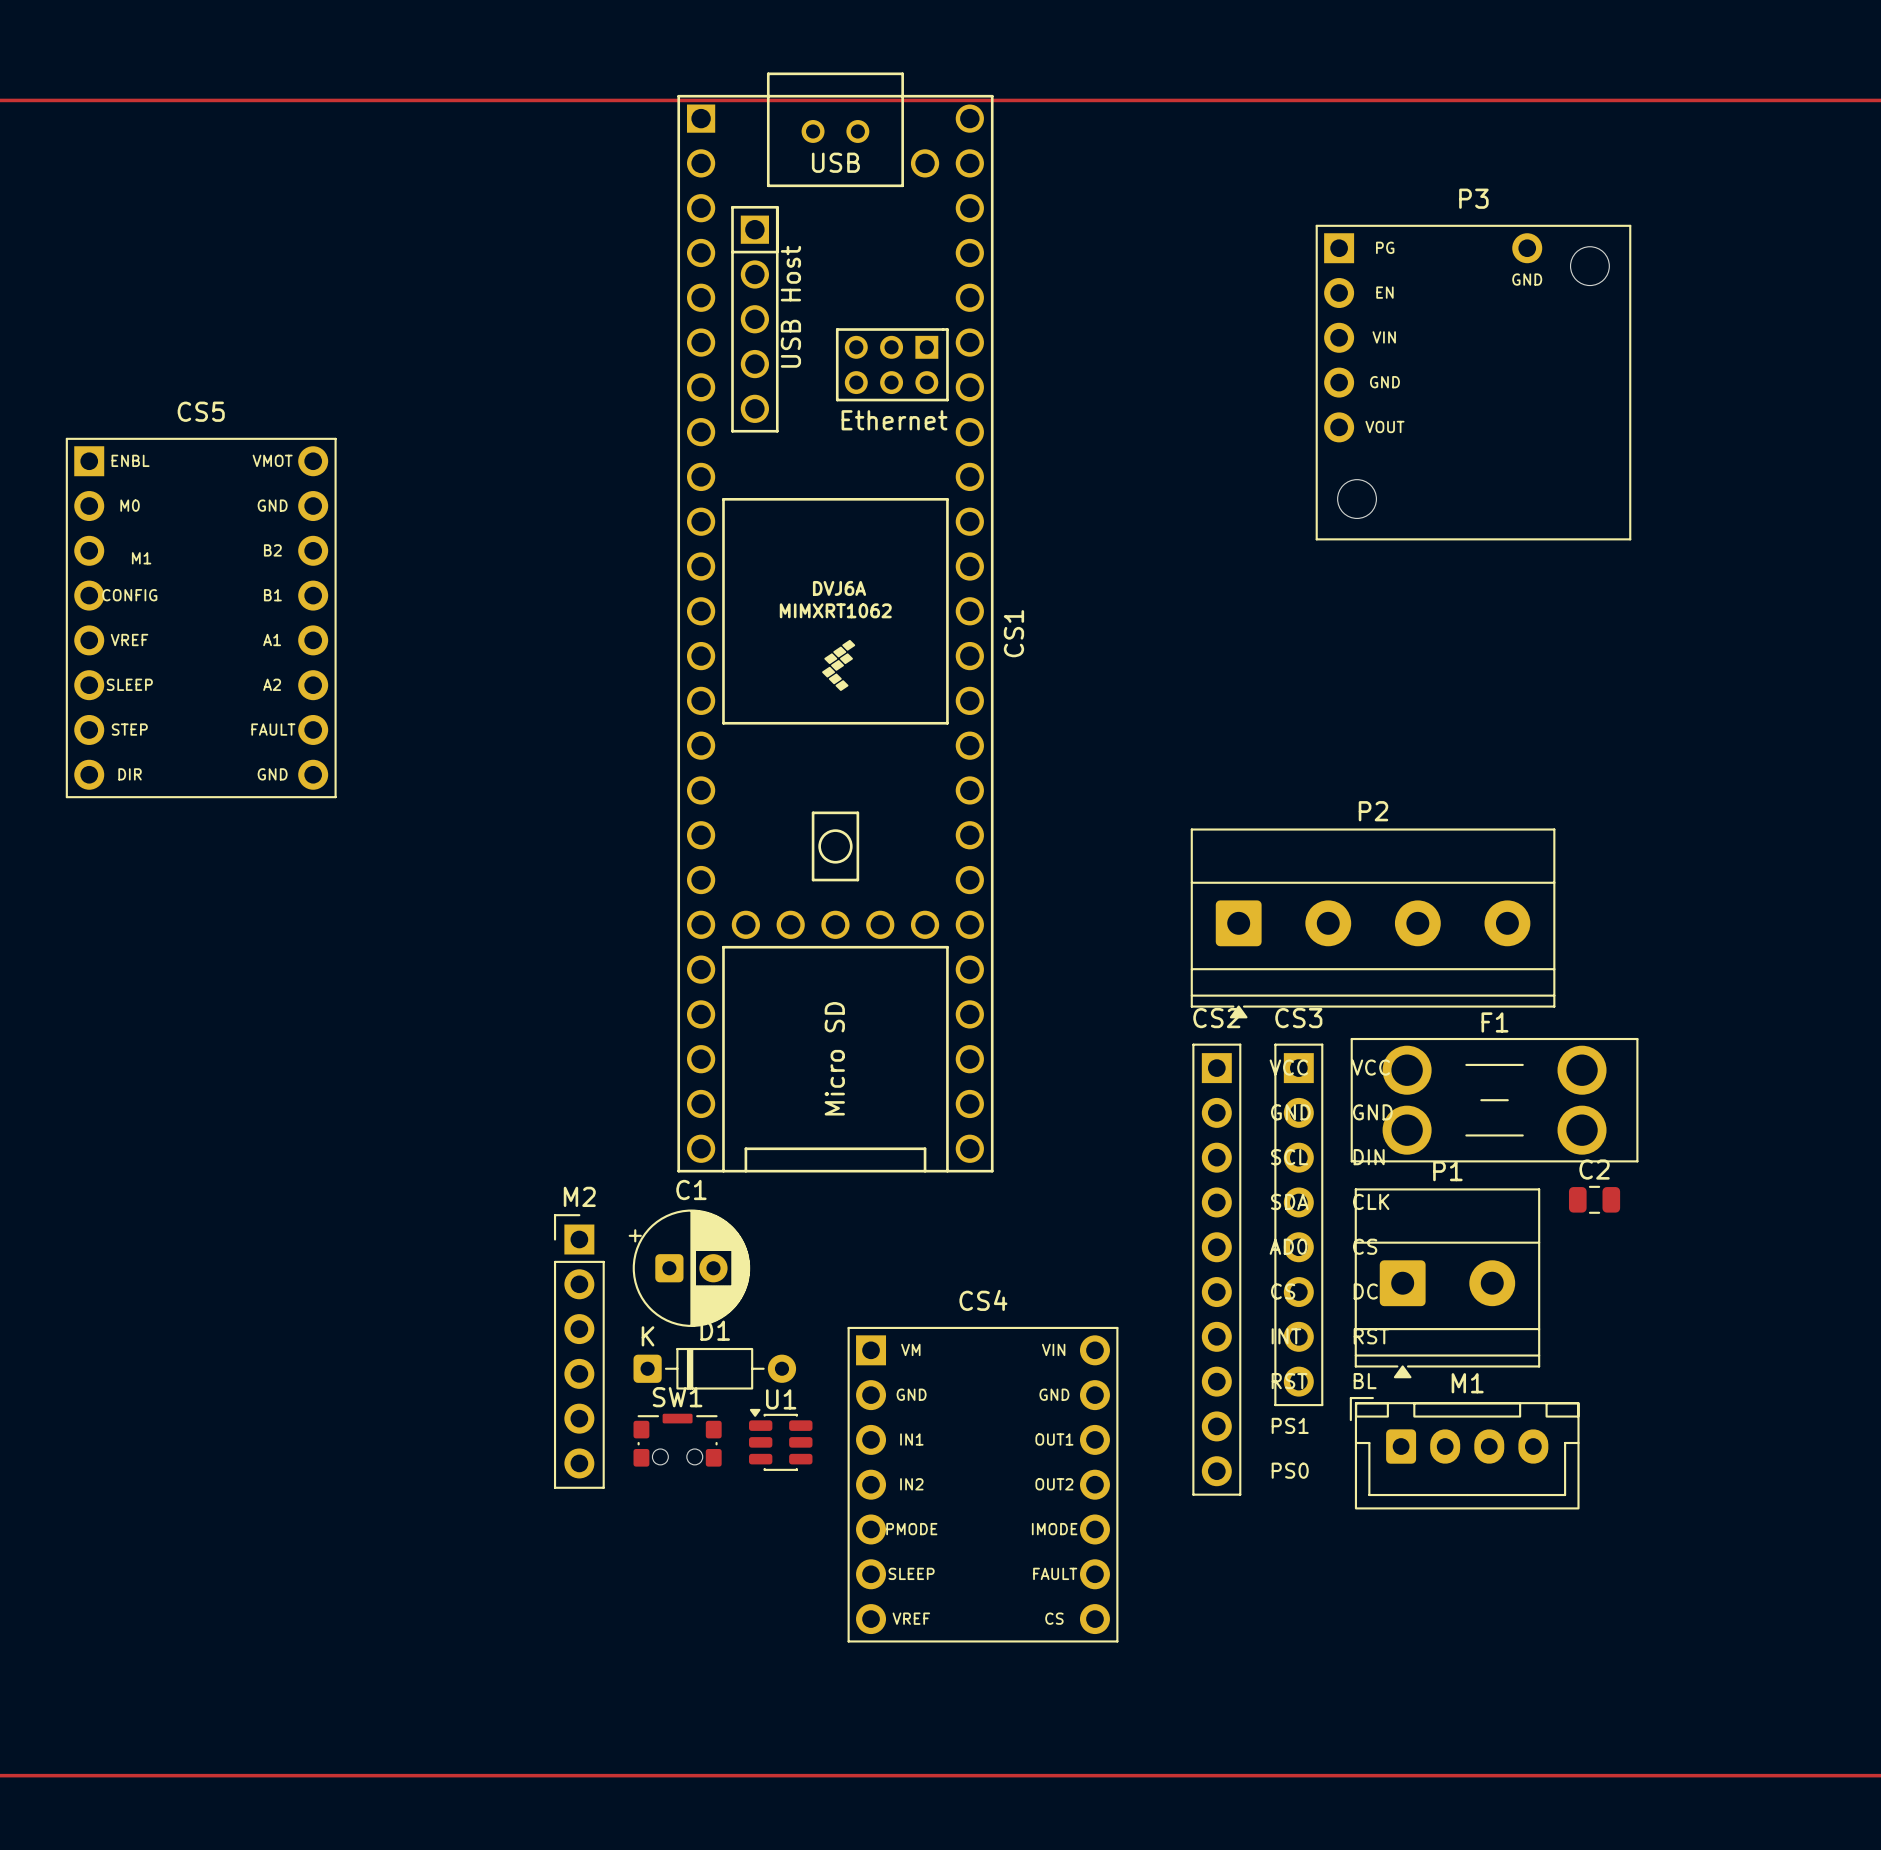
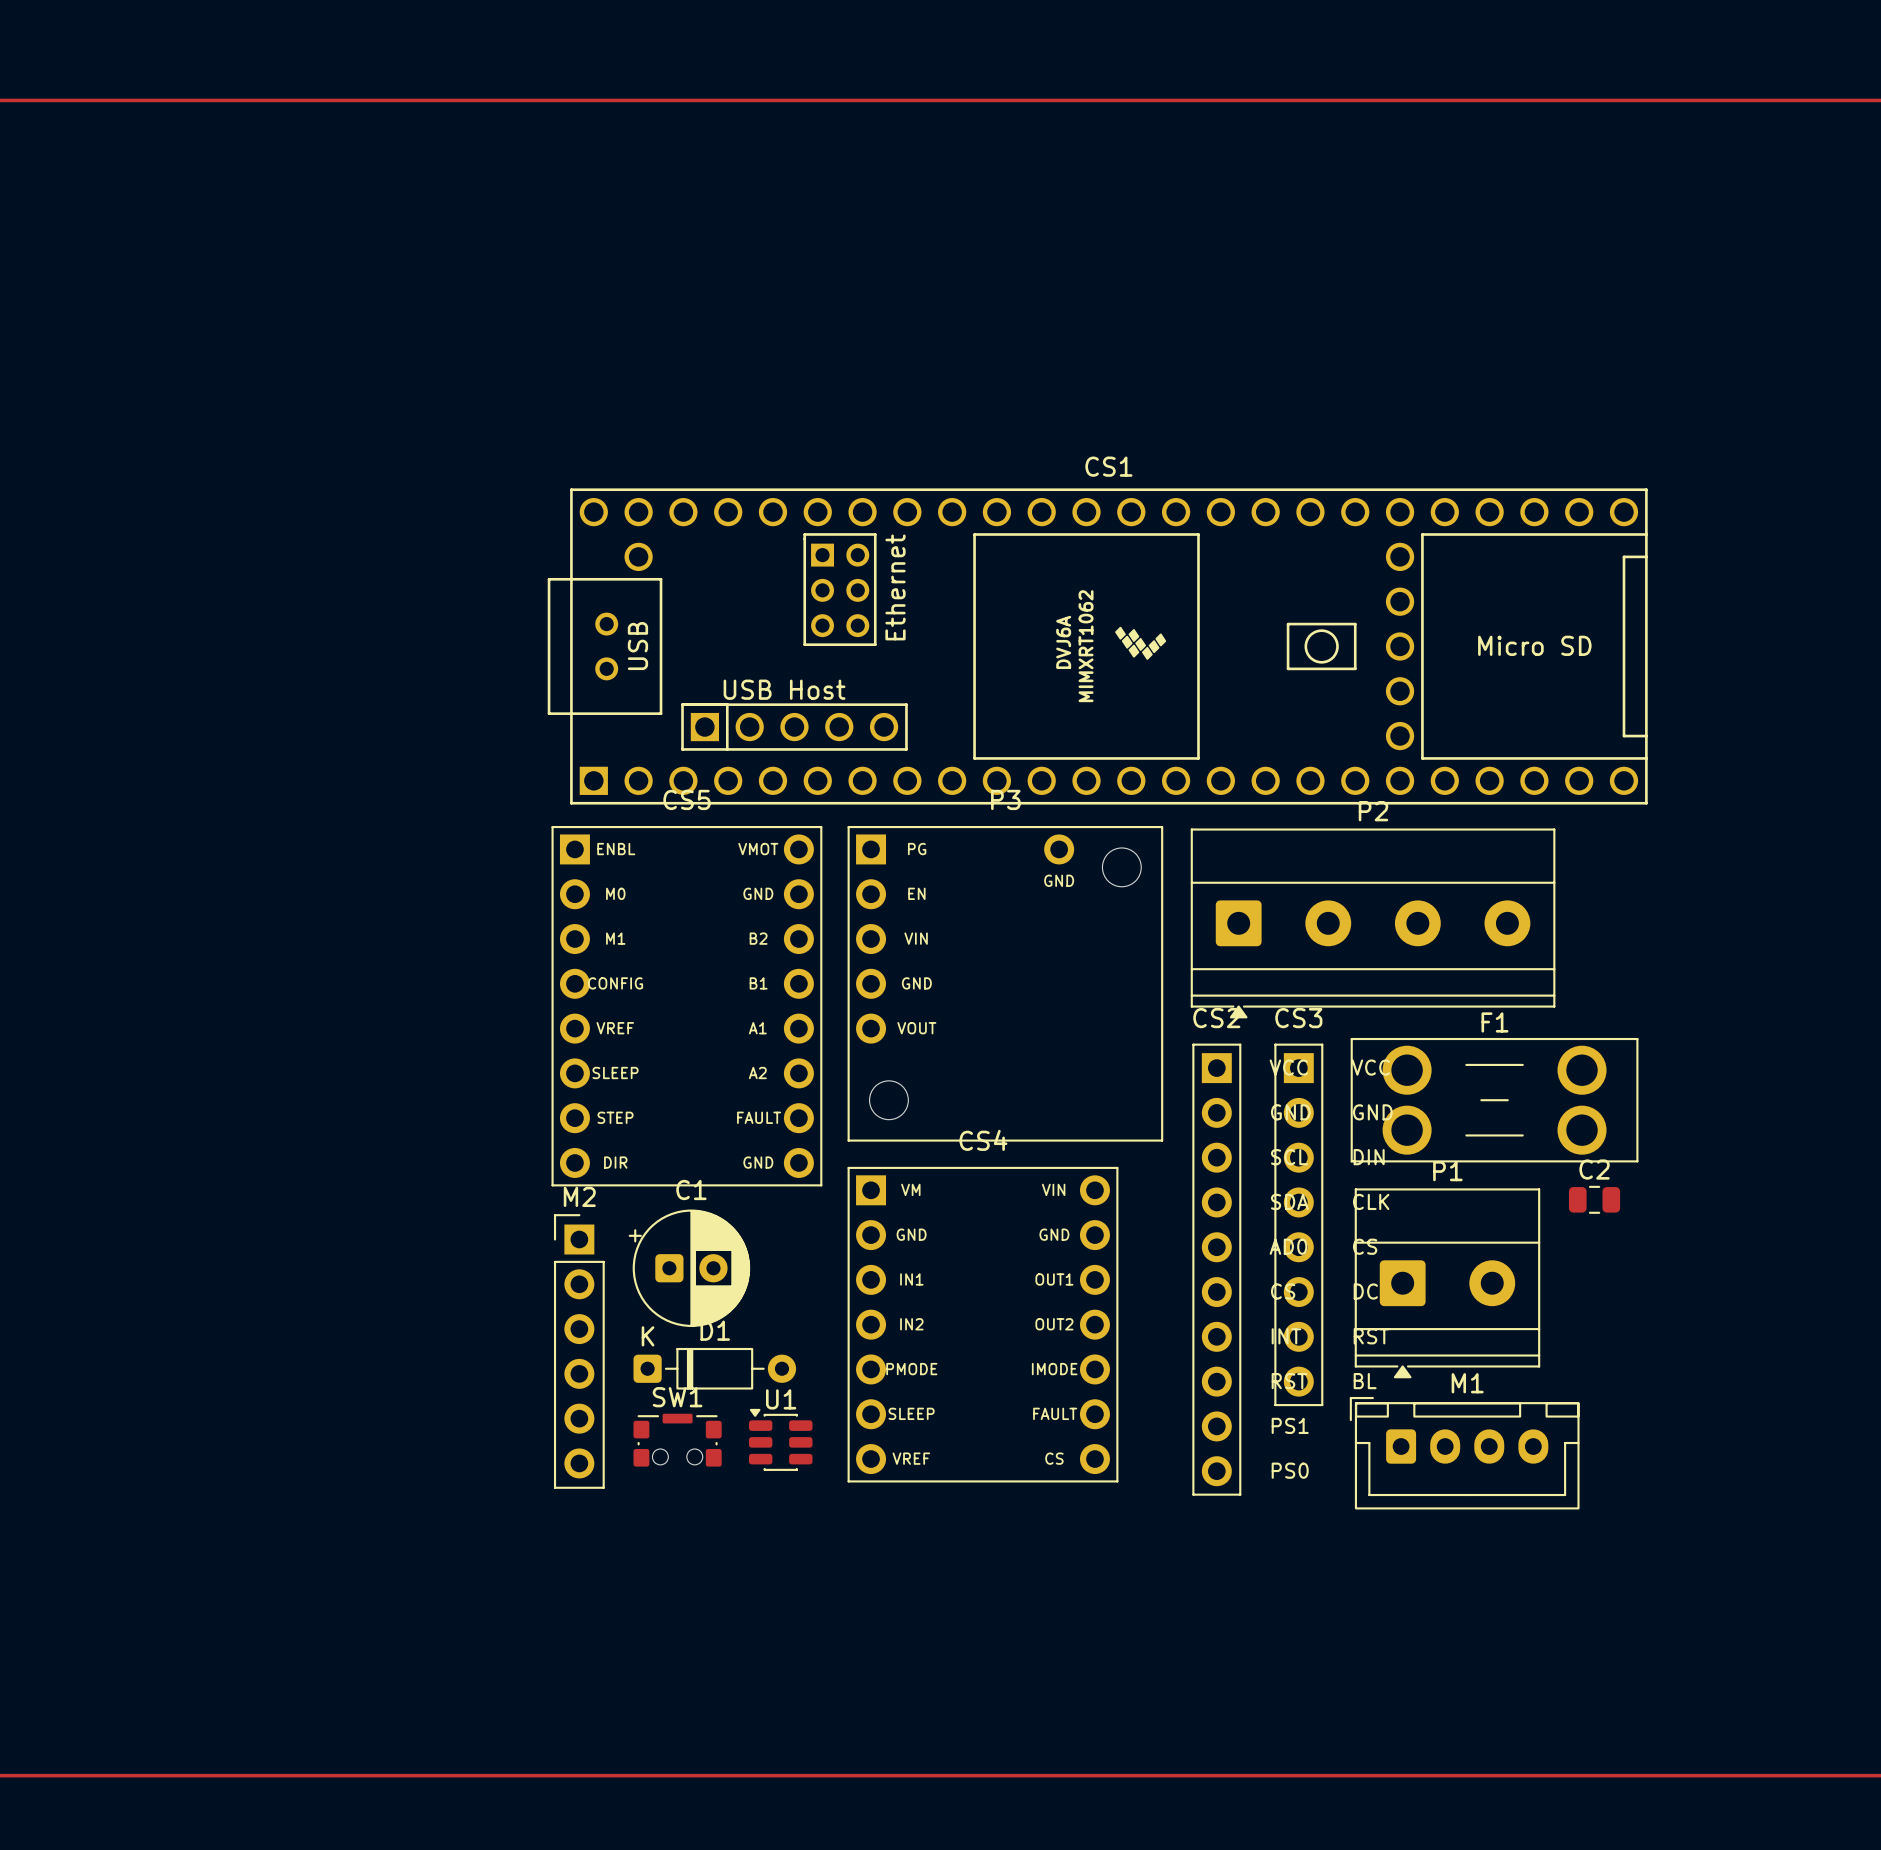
P3 position: (1473, 382) -> (1005, 983)
CS5 text position: M1 (141, 558) -> M1 (615, 938)
CS5 position: (201, 618) -> (686, 1006)
CS1 rotation: 0° (835, 622) -> 90° counterclockwise (1097, 646)
CS4 position: (983, 1484) -> (983, 1324)

